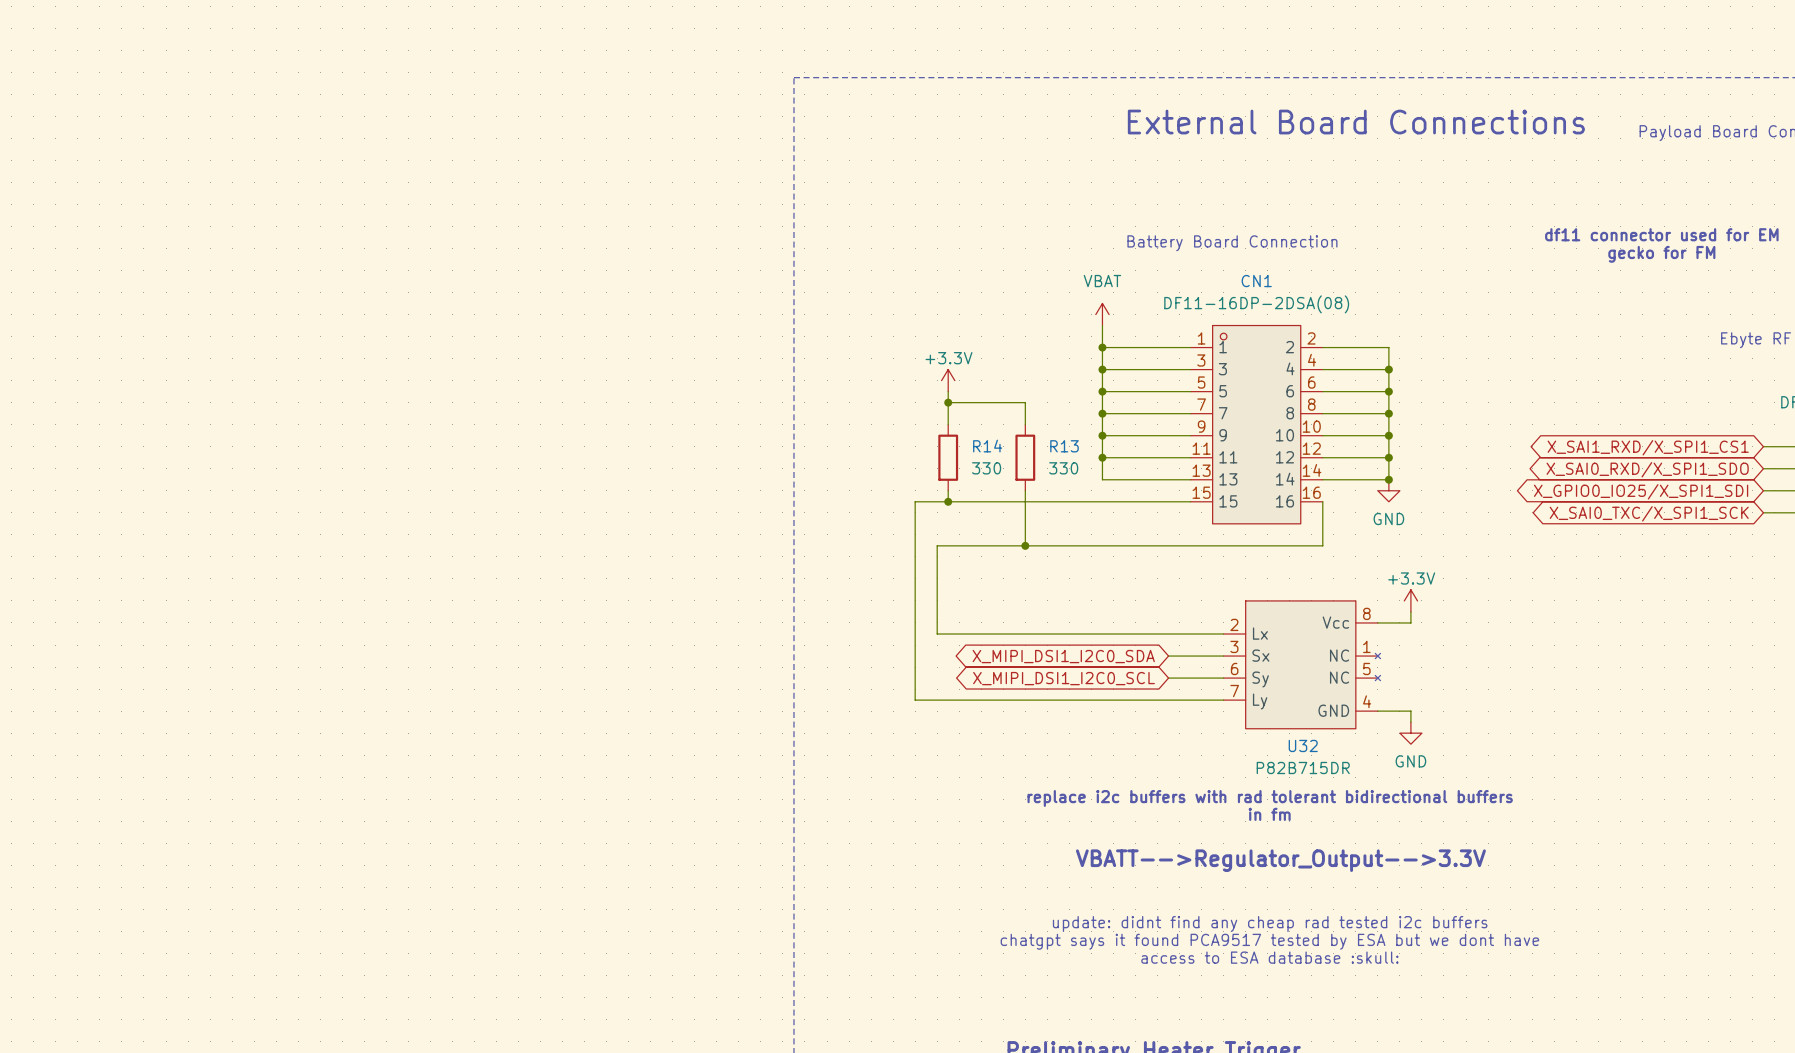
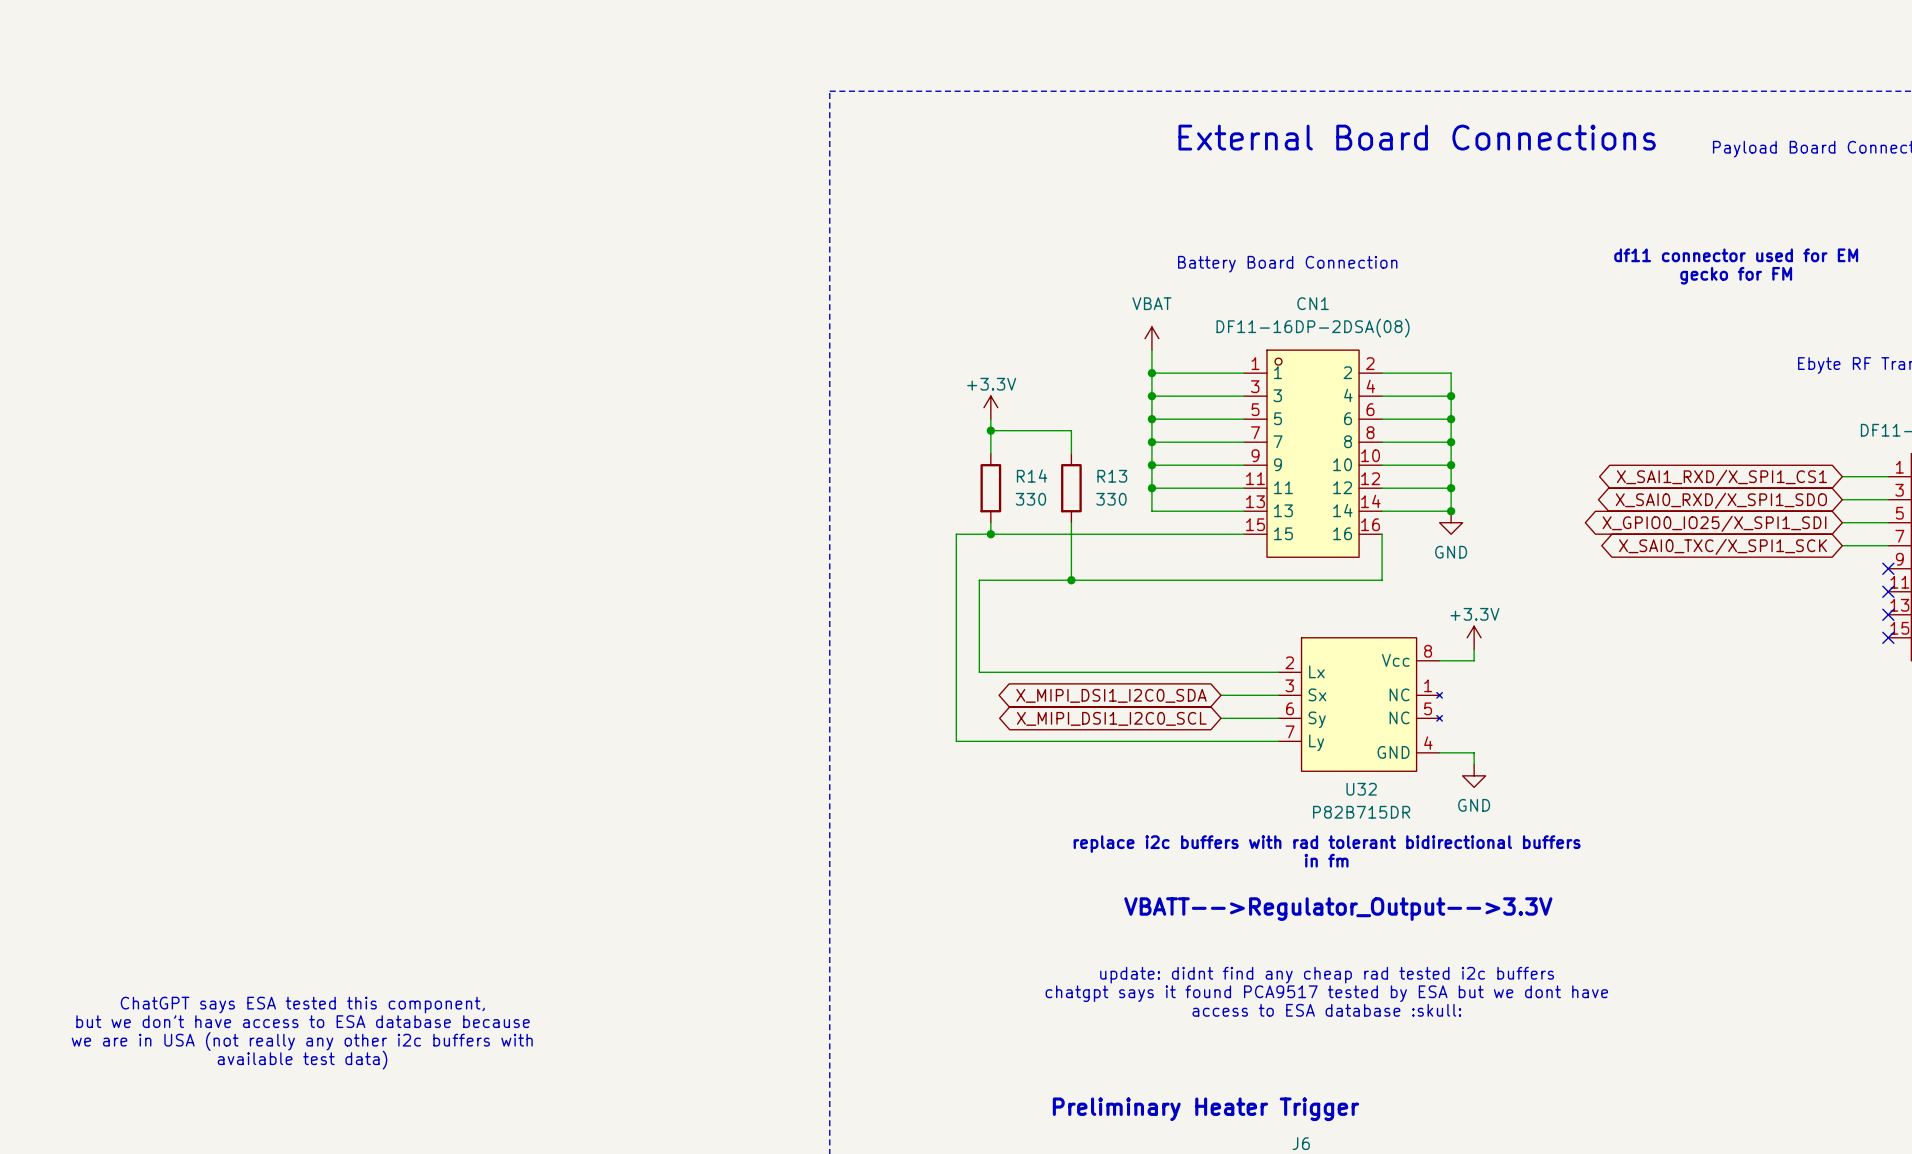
text: none -> ChatGPT says ESA tested this component, (302, 1005)
text: none -> but we don’t have access to ESA database because (303, 1021)
text: none -> we are in USA (not really any other i2c buffers with (302, 1041)
text: none -> available test data) (302, 1060)

